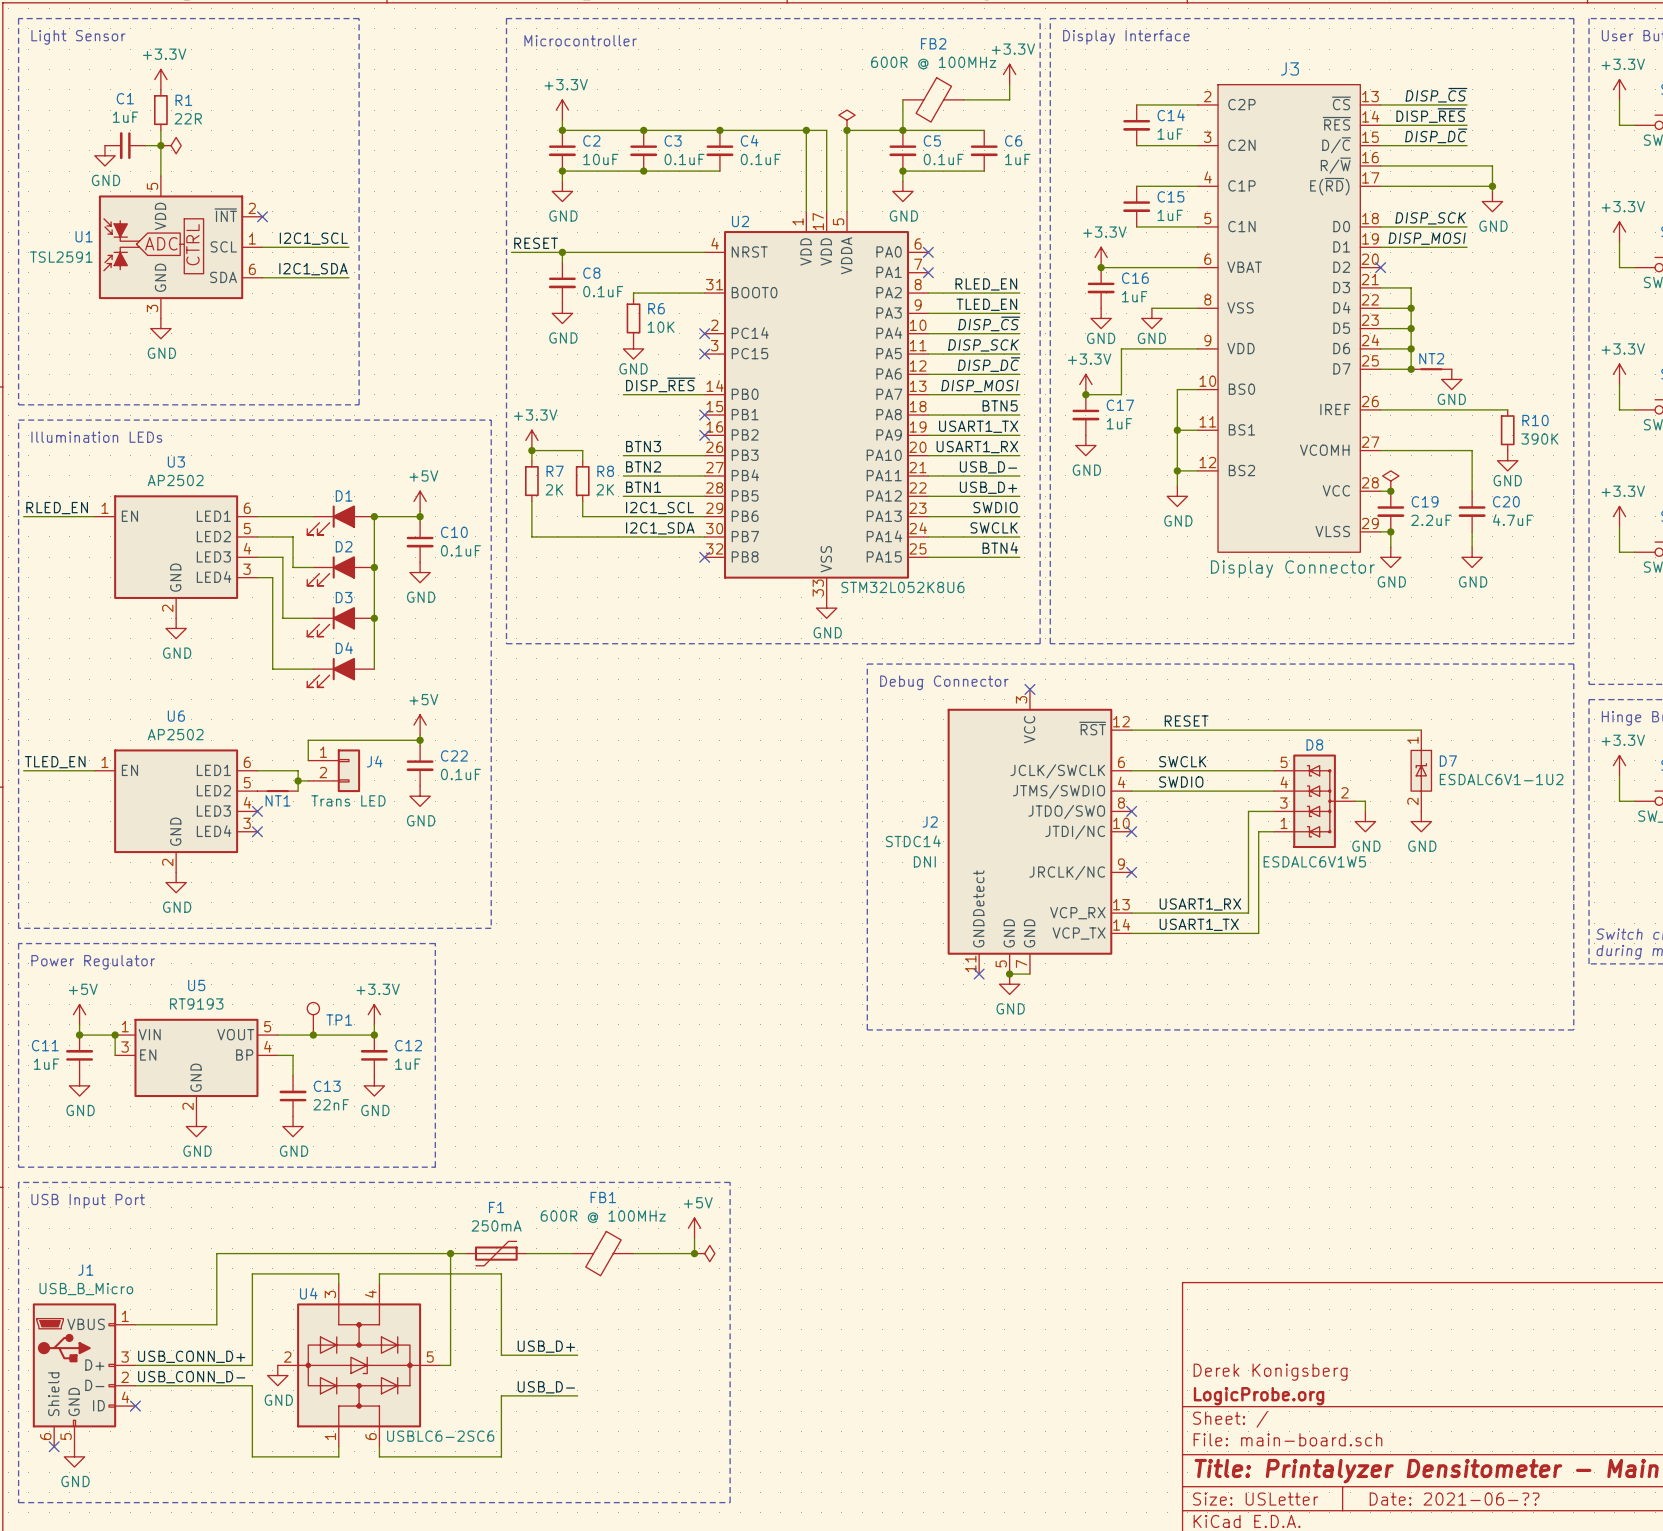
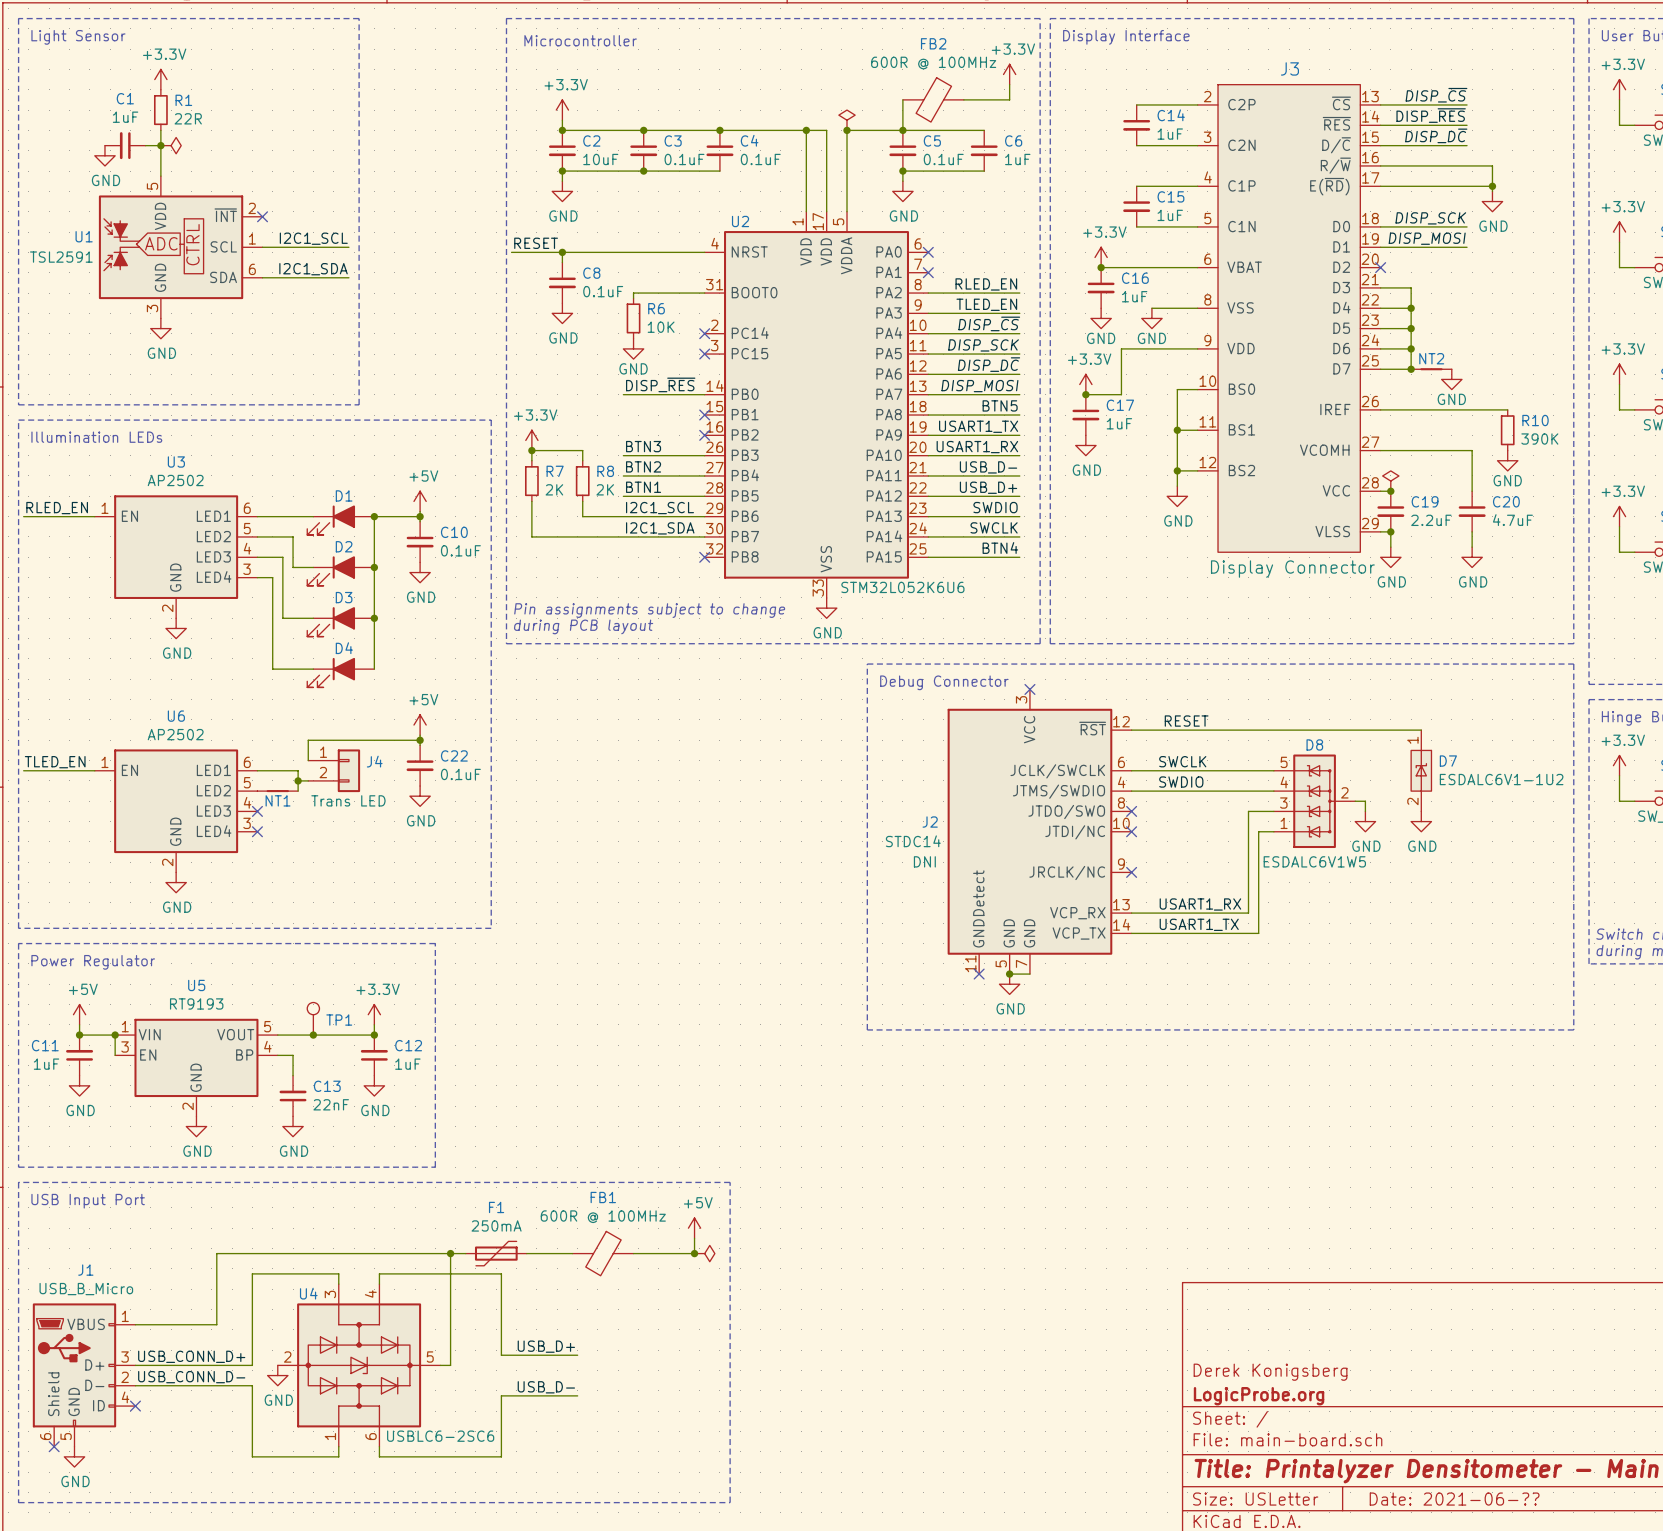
U2 value: STM32L052K8U6 (902, 587) -> STM32L052K6U6 (902, 587)
text: none -> Pin assignments subject to change (649, 610)
text: none -> during PCB layout (583, 626)

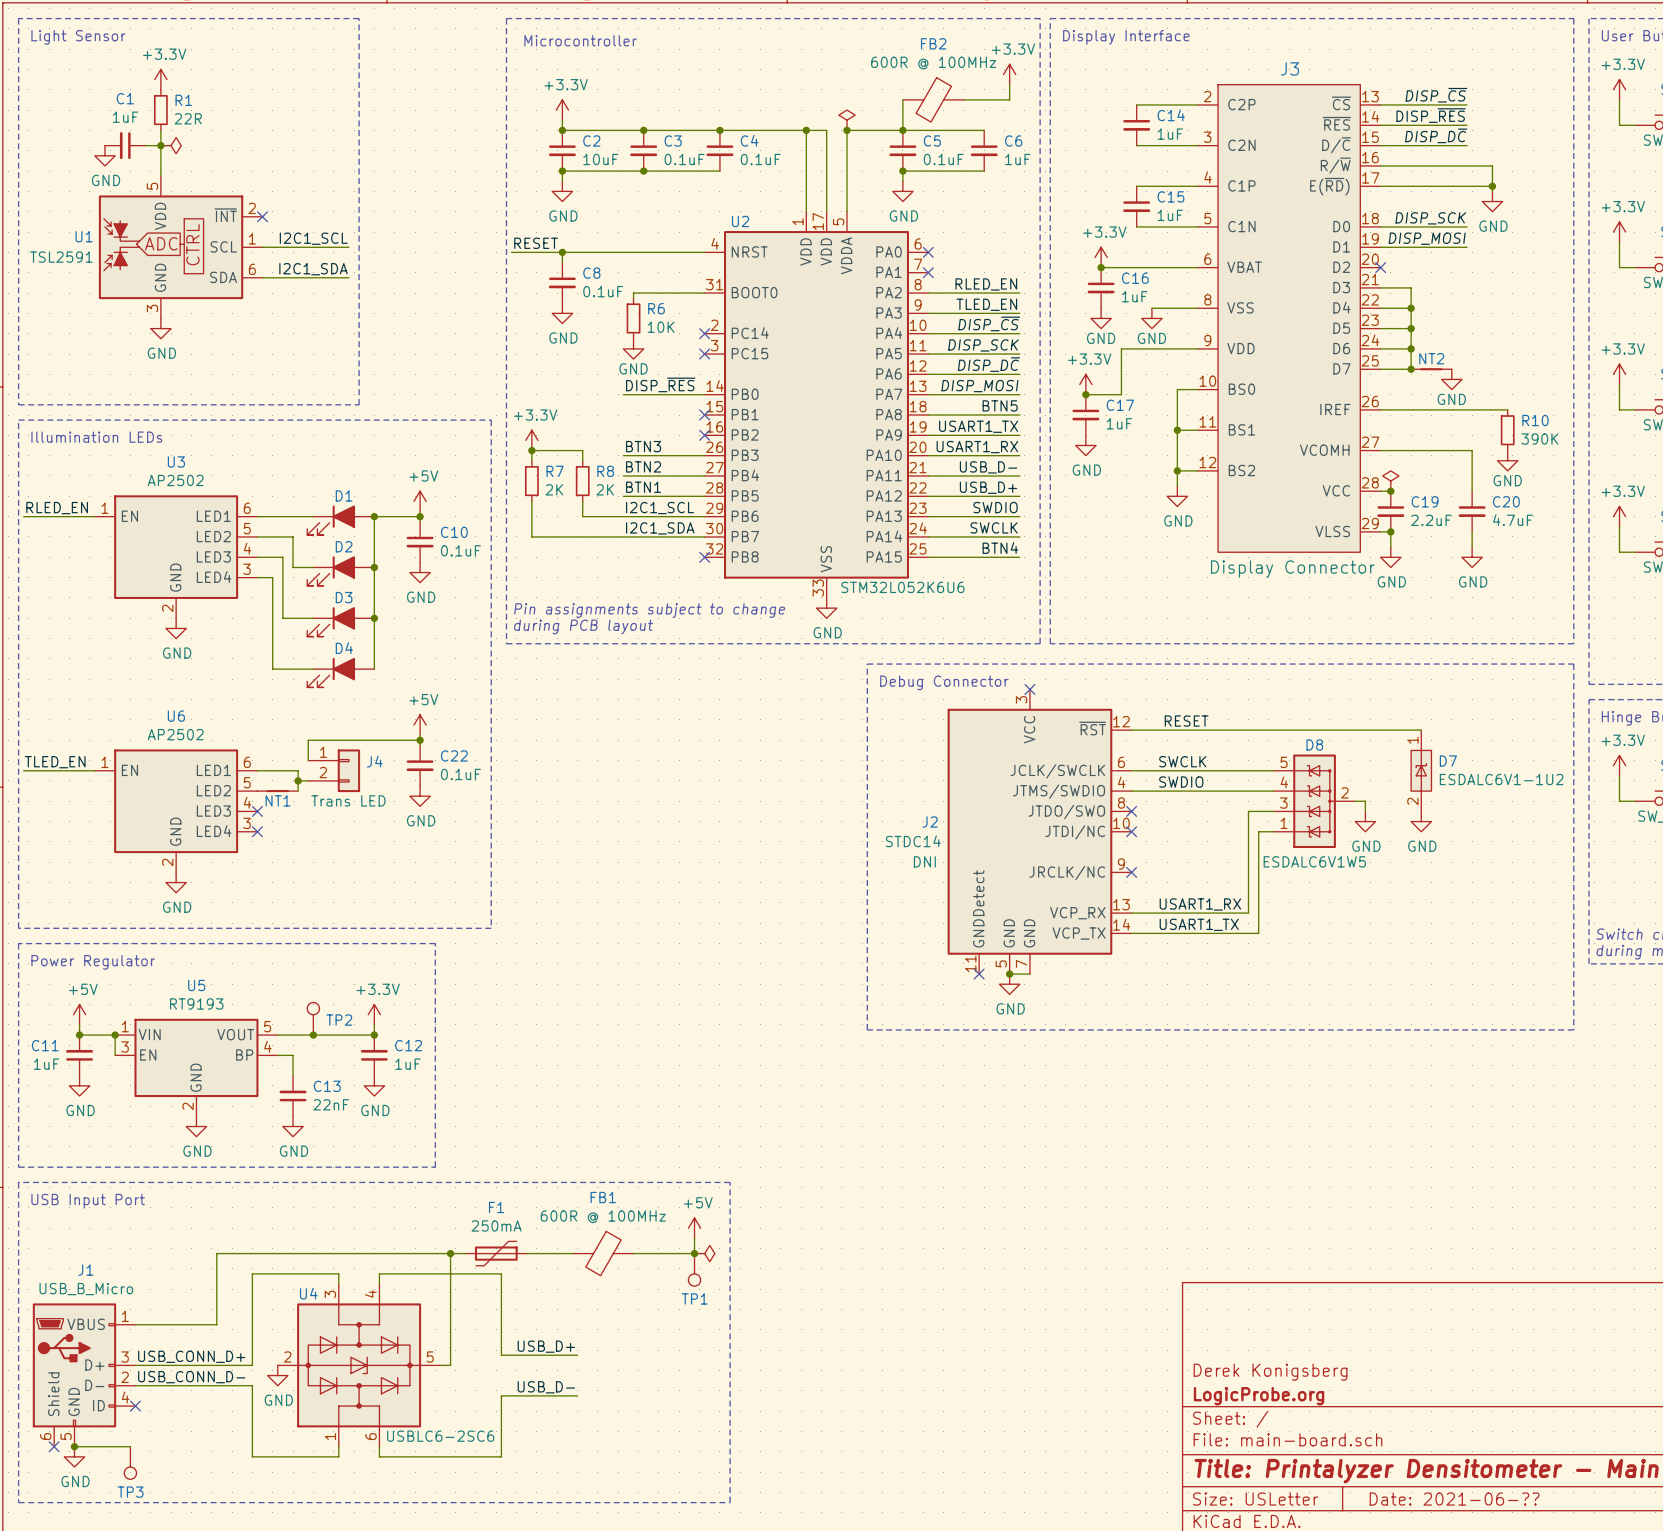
TP1 name: TP1 (339, 1020) -> TP2 (339, 1020)
TP1: none -> (694, 1269)
wire: none -> (74, 1446) (130, 1446)
junction: none -> (74, 1446)
TP3: none -> (130, 1462)

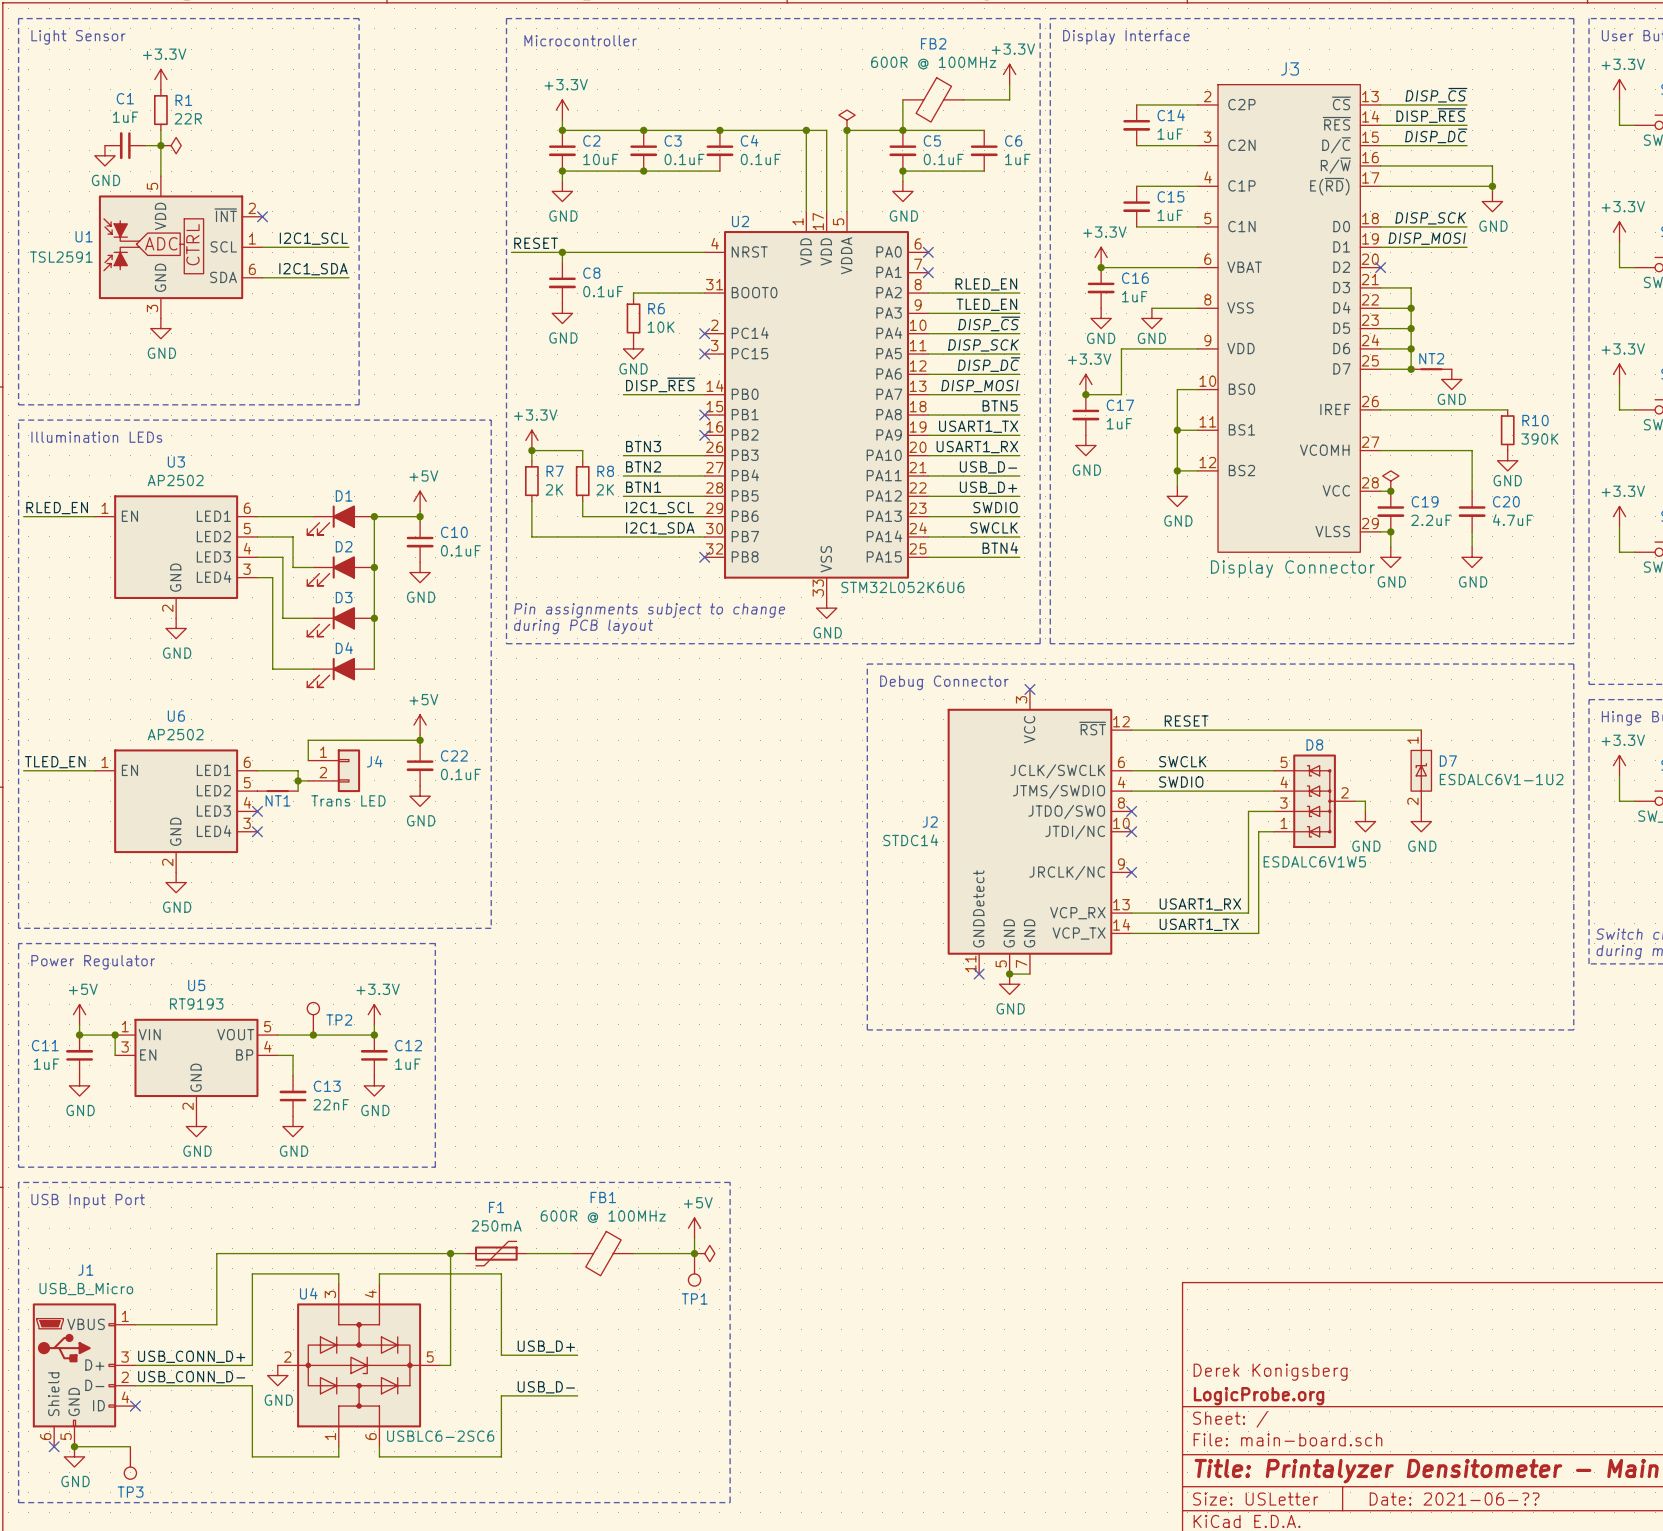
J2 text: STDC14 (913, 841) -> none
J2 value: DNI (924, 861) -> STDC14 (910, 840)

